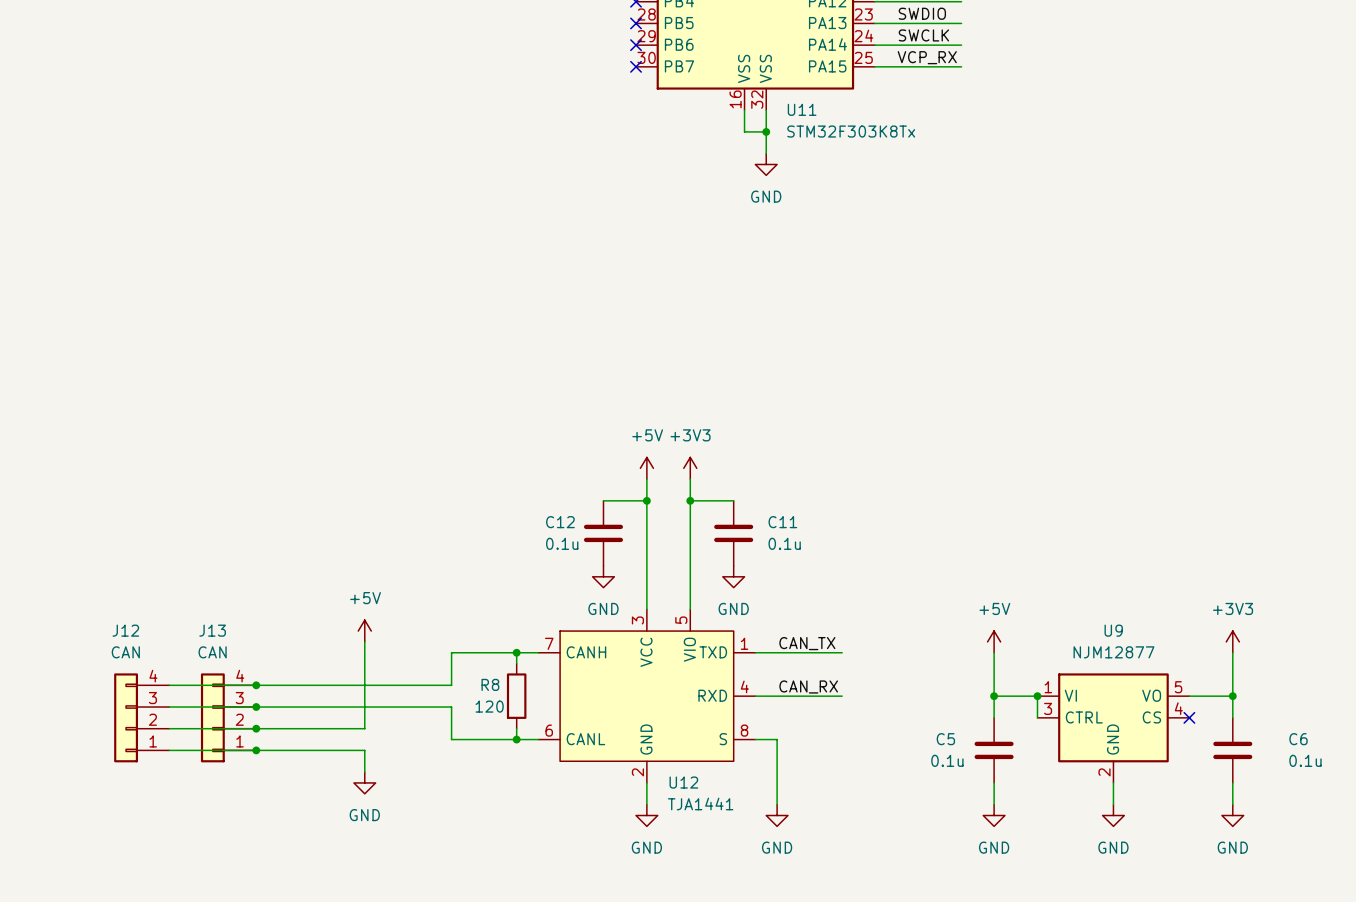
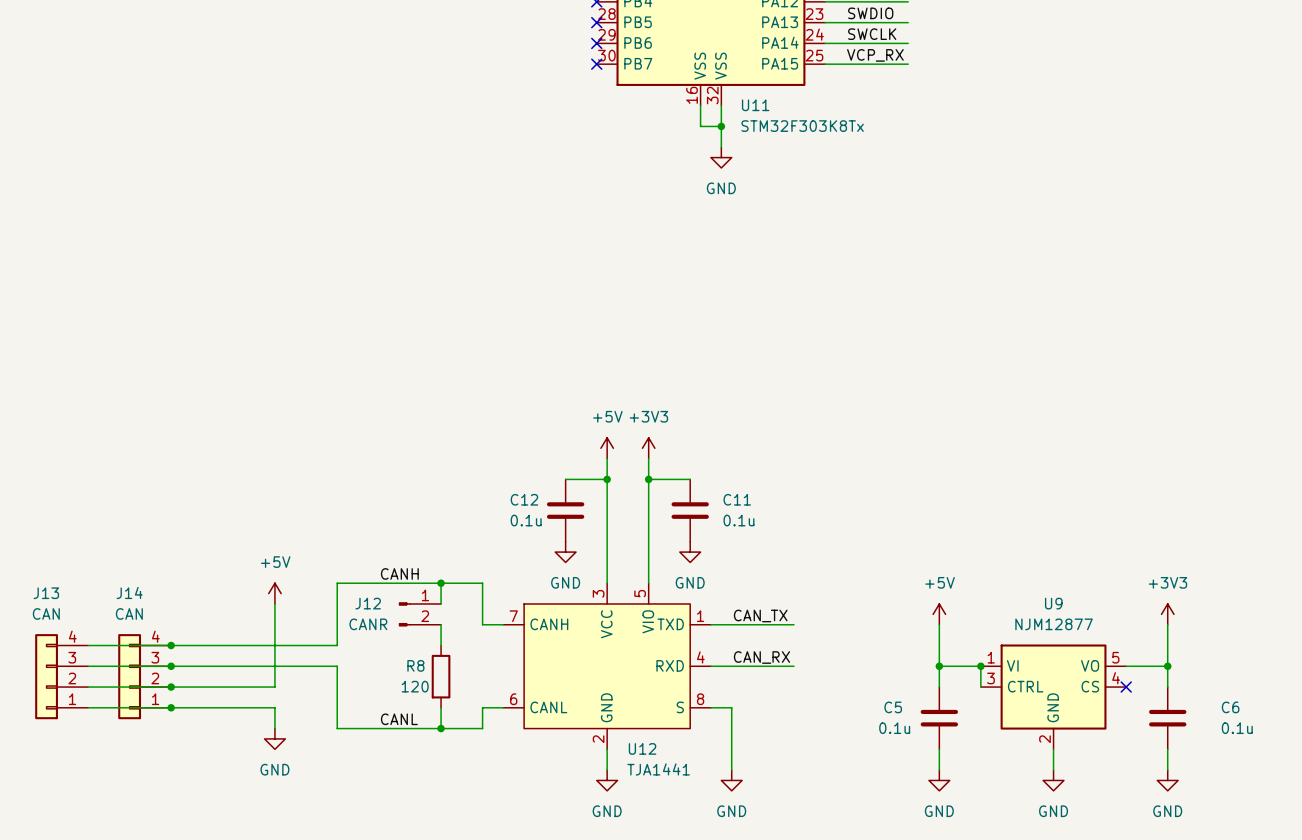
label: none -> CANH (399, 573)
wire: none -> (441, 583) (441, 603)
junction: none -> (441, 583)
J12 name position: J12 (125, 630) -> J12 (368, 603)
wire: none -> (274, 603) (274, 687) (88, 687)
power symbol position: +5V (364, 631) -> +5V (274, 593)
wire: none -> (337, 614) (337, 583) (482, 583) (482, 624)
J12 value: CAN (125, 652) -> CANR (368, 624)
wire: none -> (441, 624) (441, 645)
junction: (516, 652) -> none
wire: (516, 663) (516, 652) (451, 652) (451, 685) (169, 685) -> none
J12 symbol: [114, 673, 170, 763] -> [398, 602, 442, 627]
junction: none -> (171, 645)
wire: (364, 674) (364, 696) -> (337, 645) (88, 645)
junction: (256, 685) -> none
wire: none -> (88, 666) (337, 666)
junction: none -> (171, 666)
R8 position: (516, 696) -> (441, 676)
J14: none -> CAN (144, 676)
wire: (169, 707) (451, 707) (451, 739) (516, 739) (516, 728) -> none
junction: (256, 707) -> none
junction: none -> (171, 687)
J13 position: (228, 717) -> (61, 676)
wire: (169, 728) (364, 728) -> (337, 718) (337, 697)
junction: (256, 728) -> none
wire: none -> (88, 707) (274, 707) (274, 728)
junction: none -> (171, 707)
wire: none -> (441, 707) (441, 728)
junction position: (516, 739) -> (441, 728)
wire: (169, 750) (364, 750) -> none
junction: (256, 750) -> none
label: none -> CANL (399, 719)
wire: (364, 761) (364, 772) -> (337, 728) (482, 728) (482, 707)
power symbol position: GND (364, 782) -> GND (274, 738)

